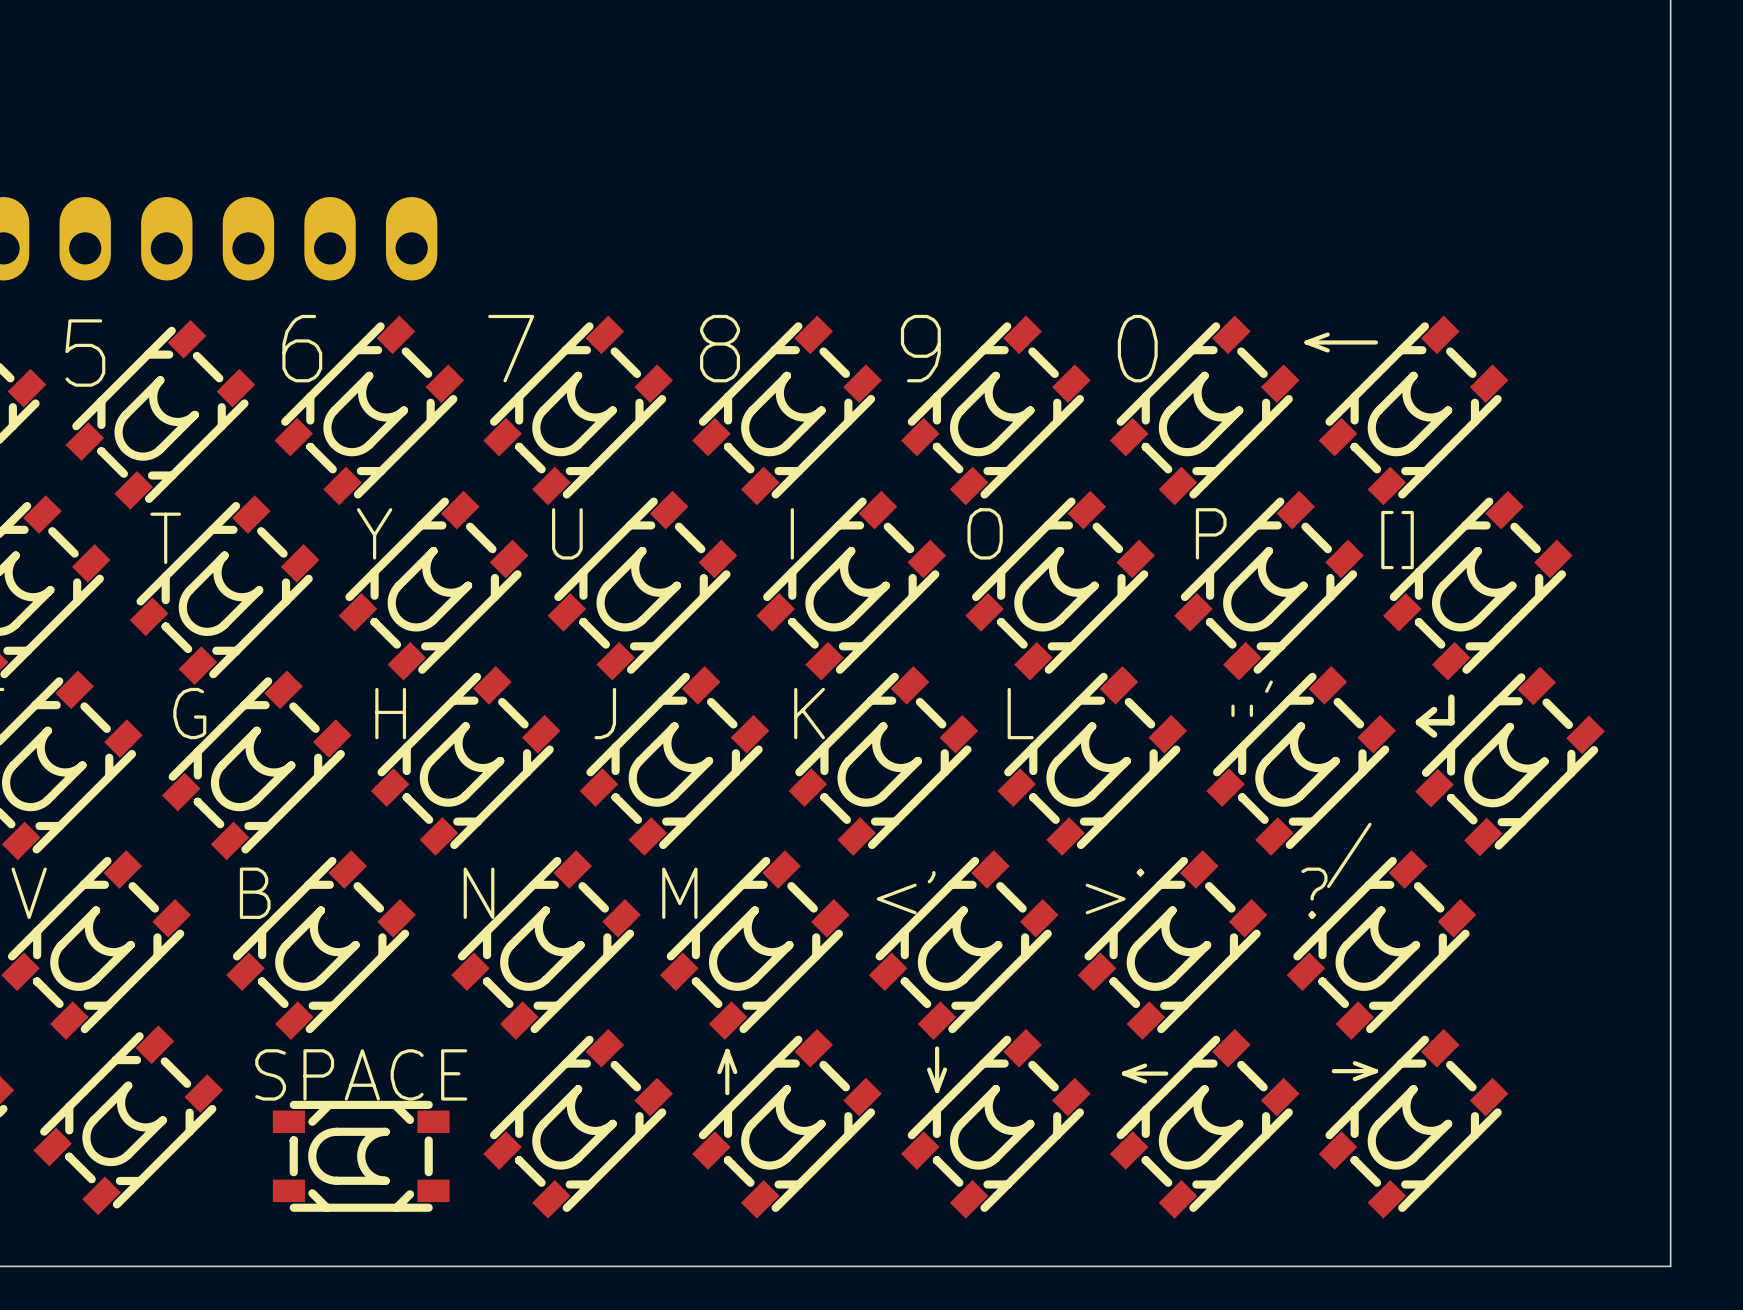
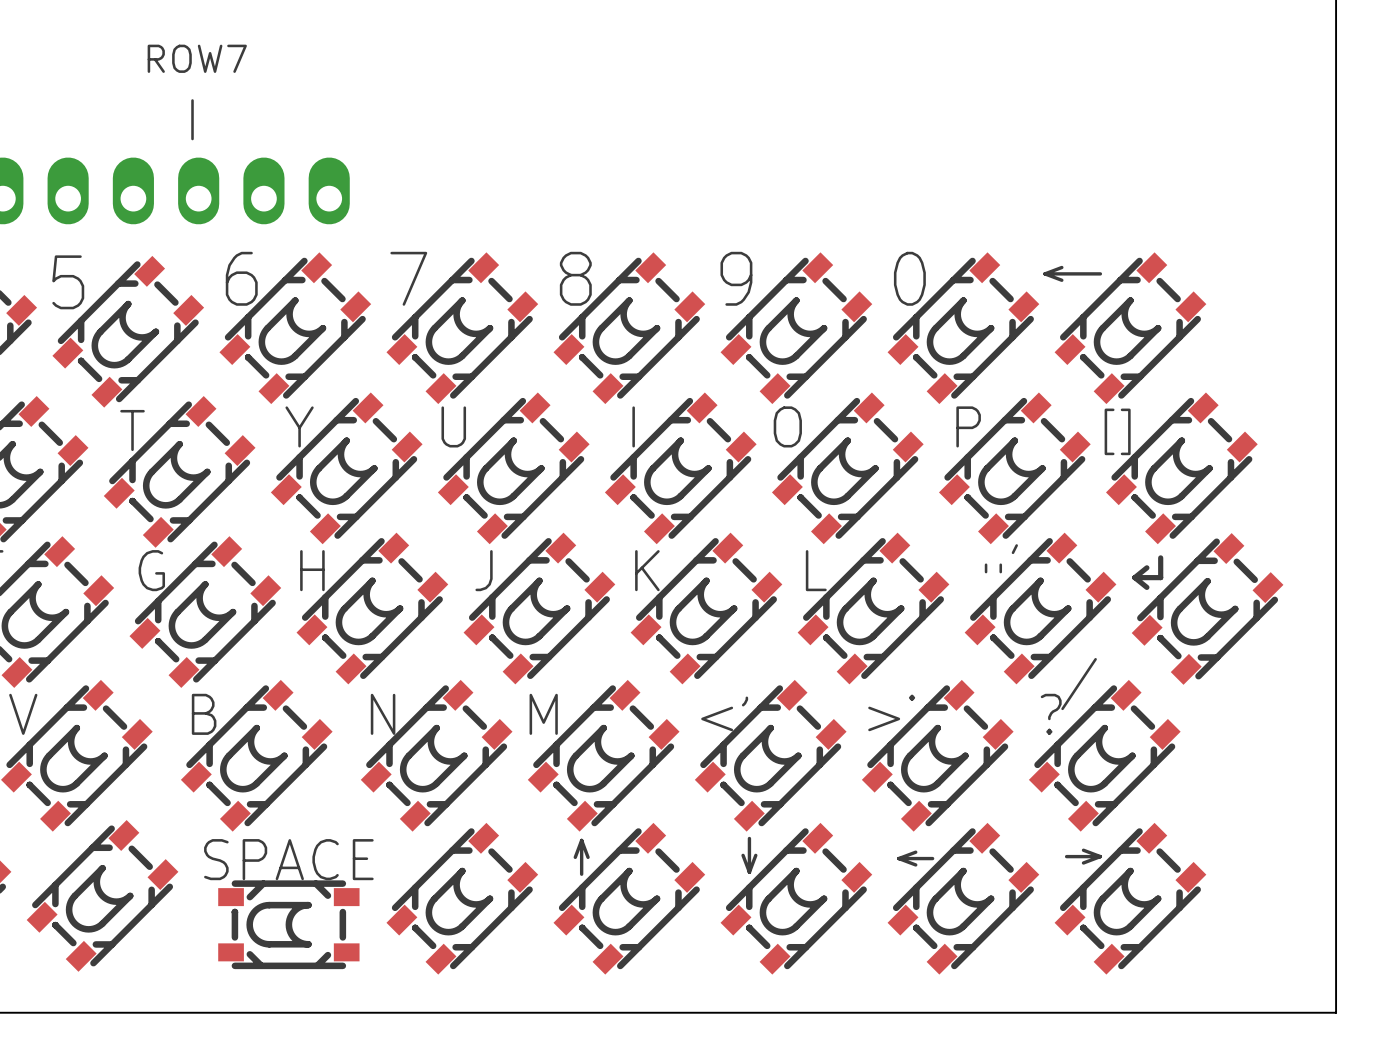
text: none -> ROW7 (197, 58)
line: none -> (192, 100) (192, 139)

